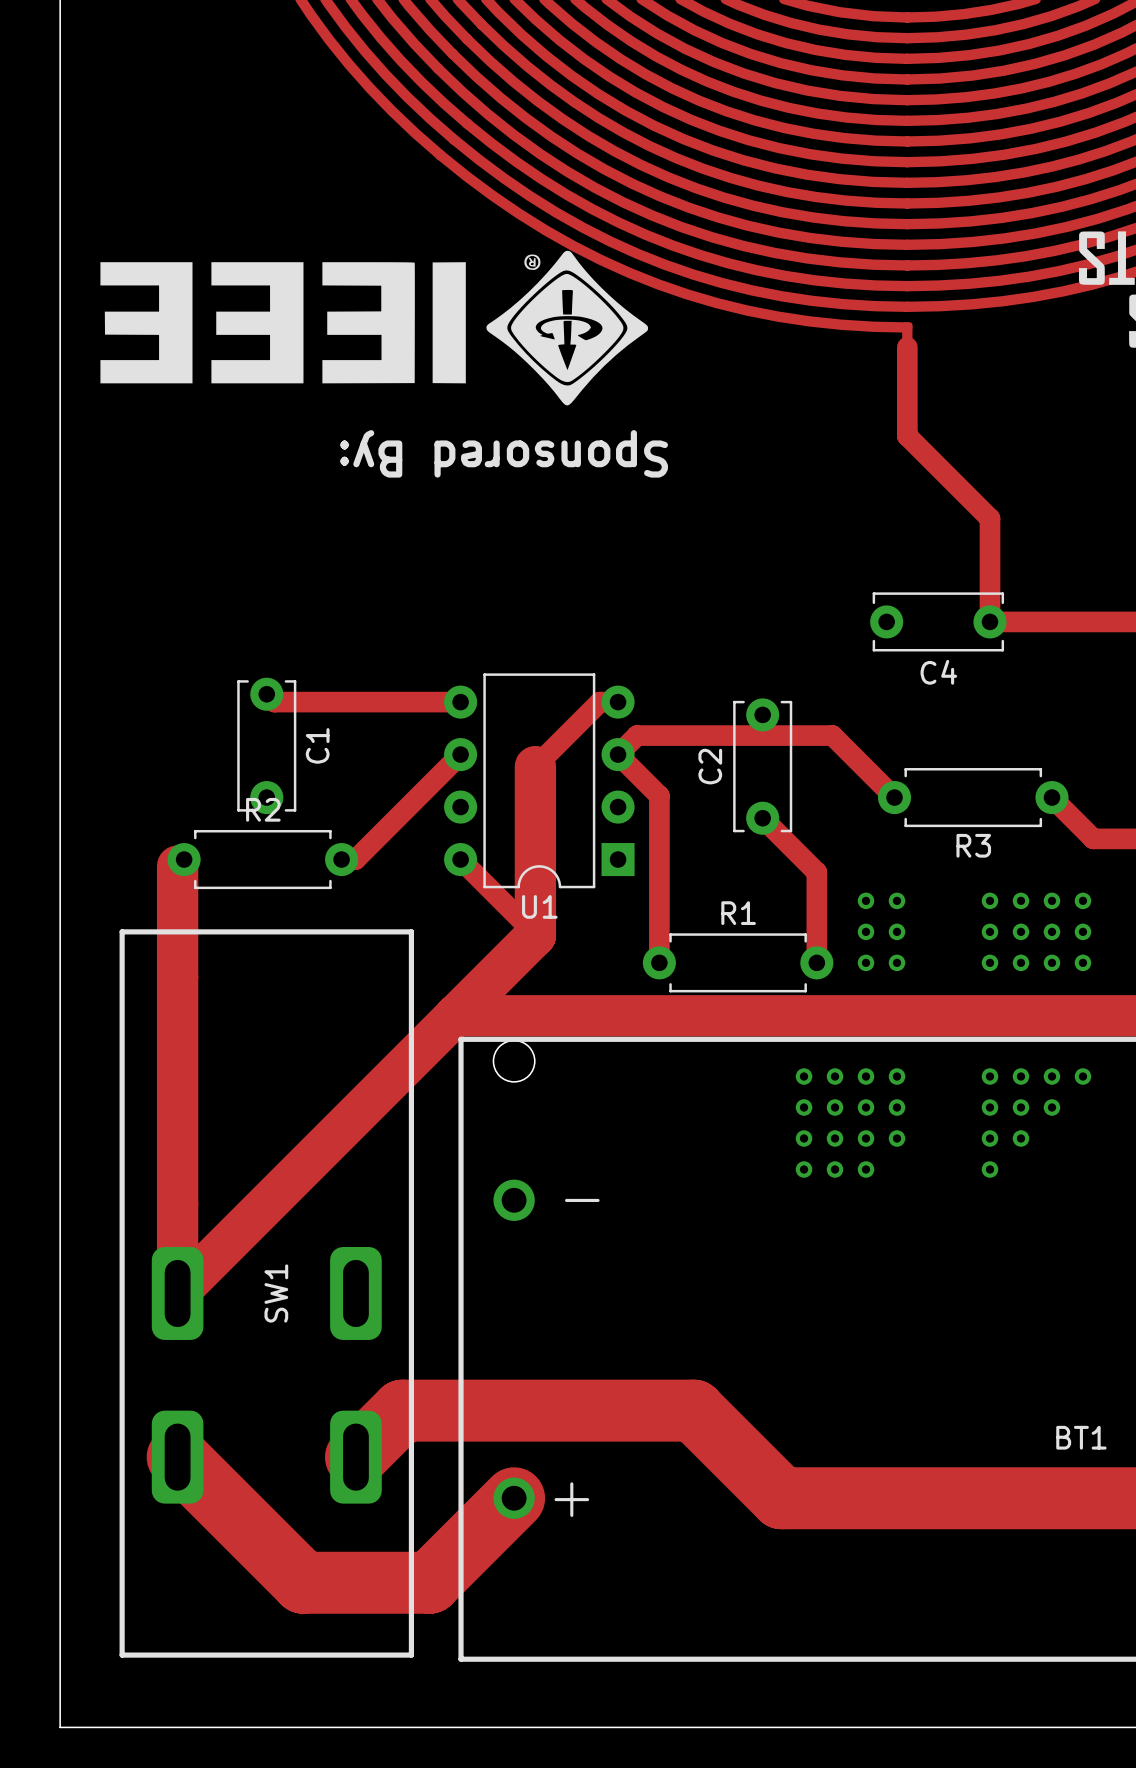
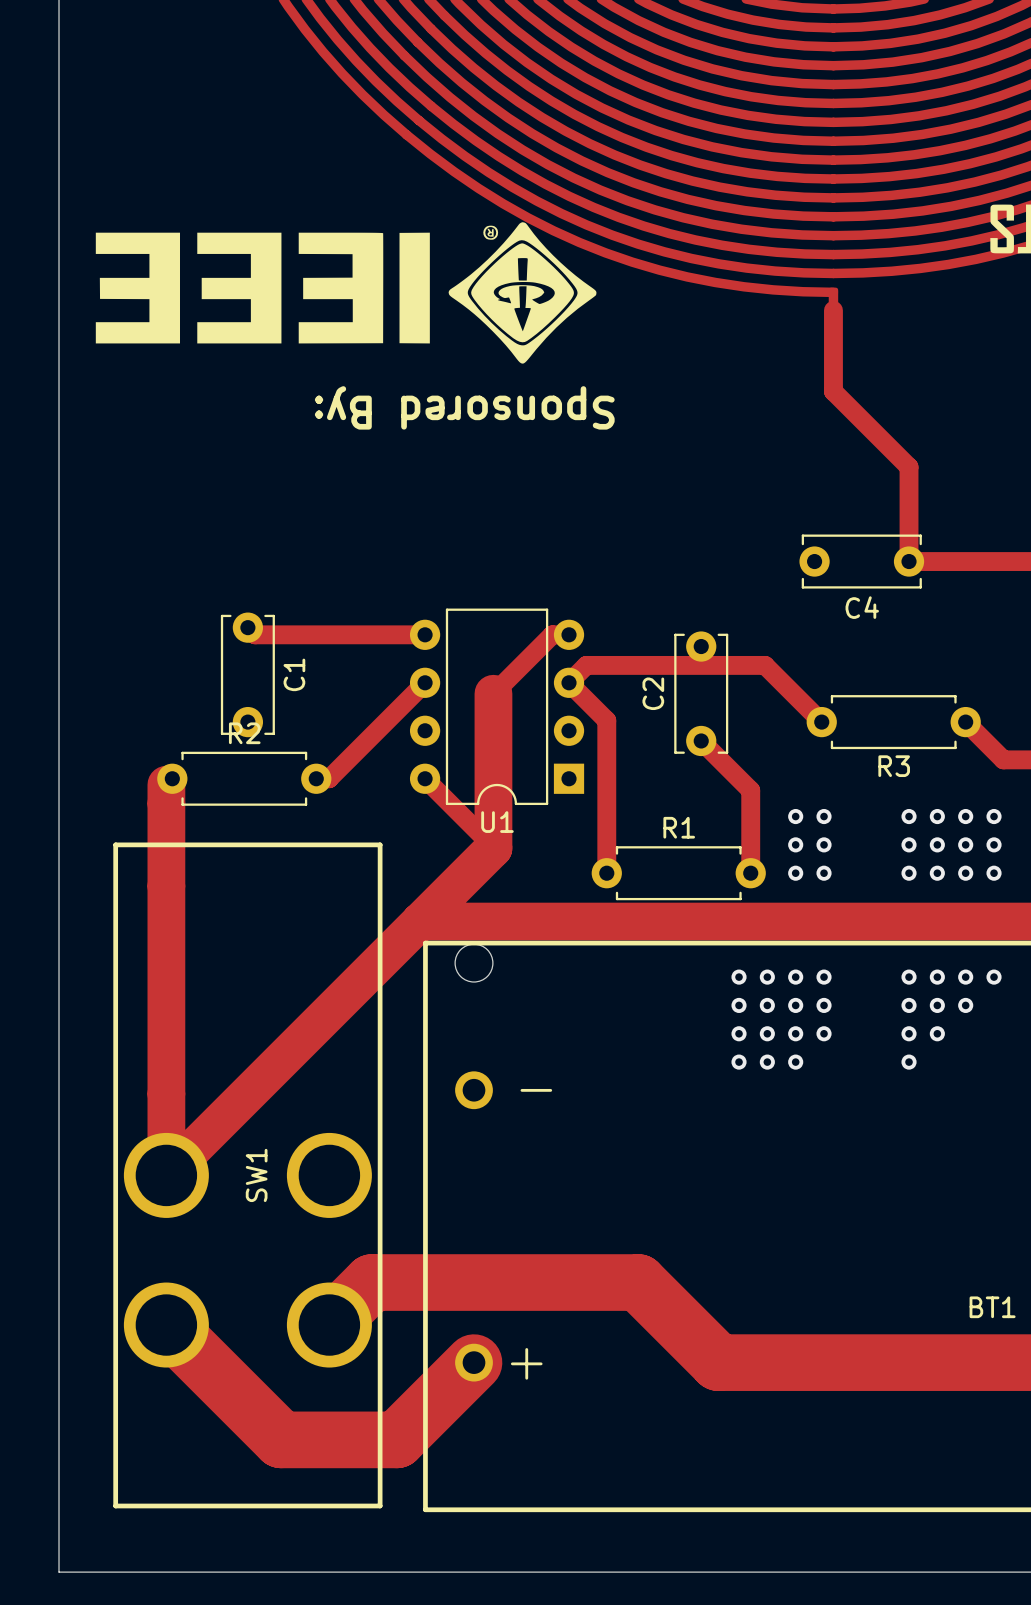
SW1 footprint: [119, 929, 415, 1658] -> [113, 842, 383, 1509]

